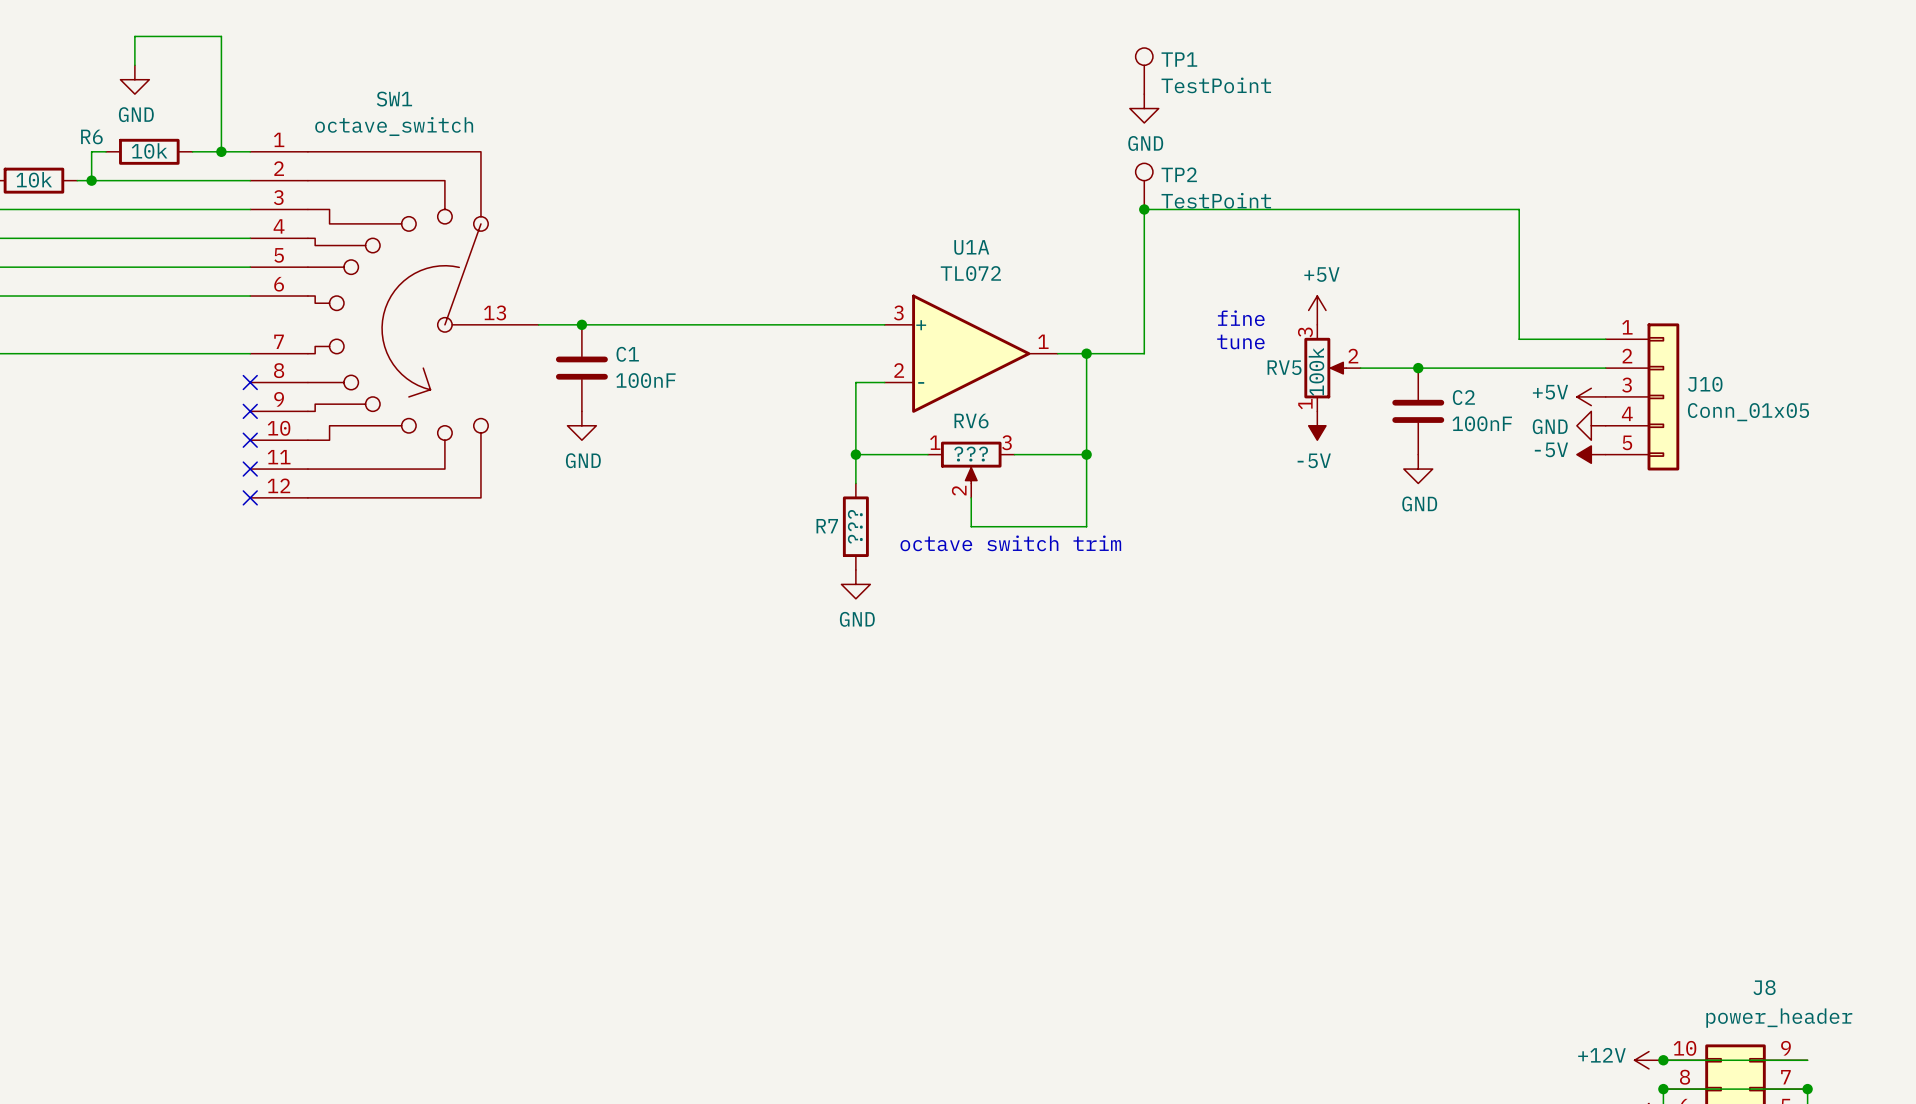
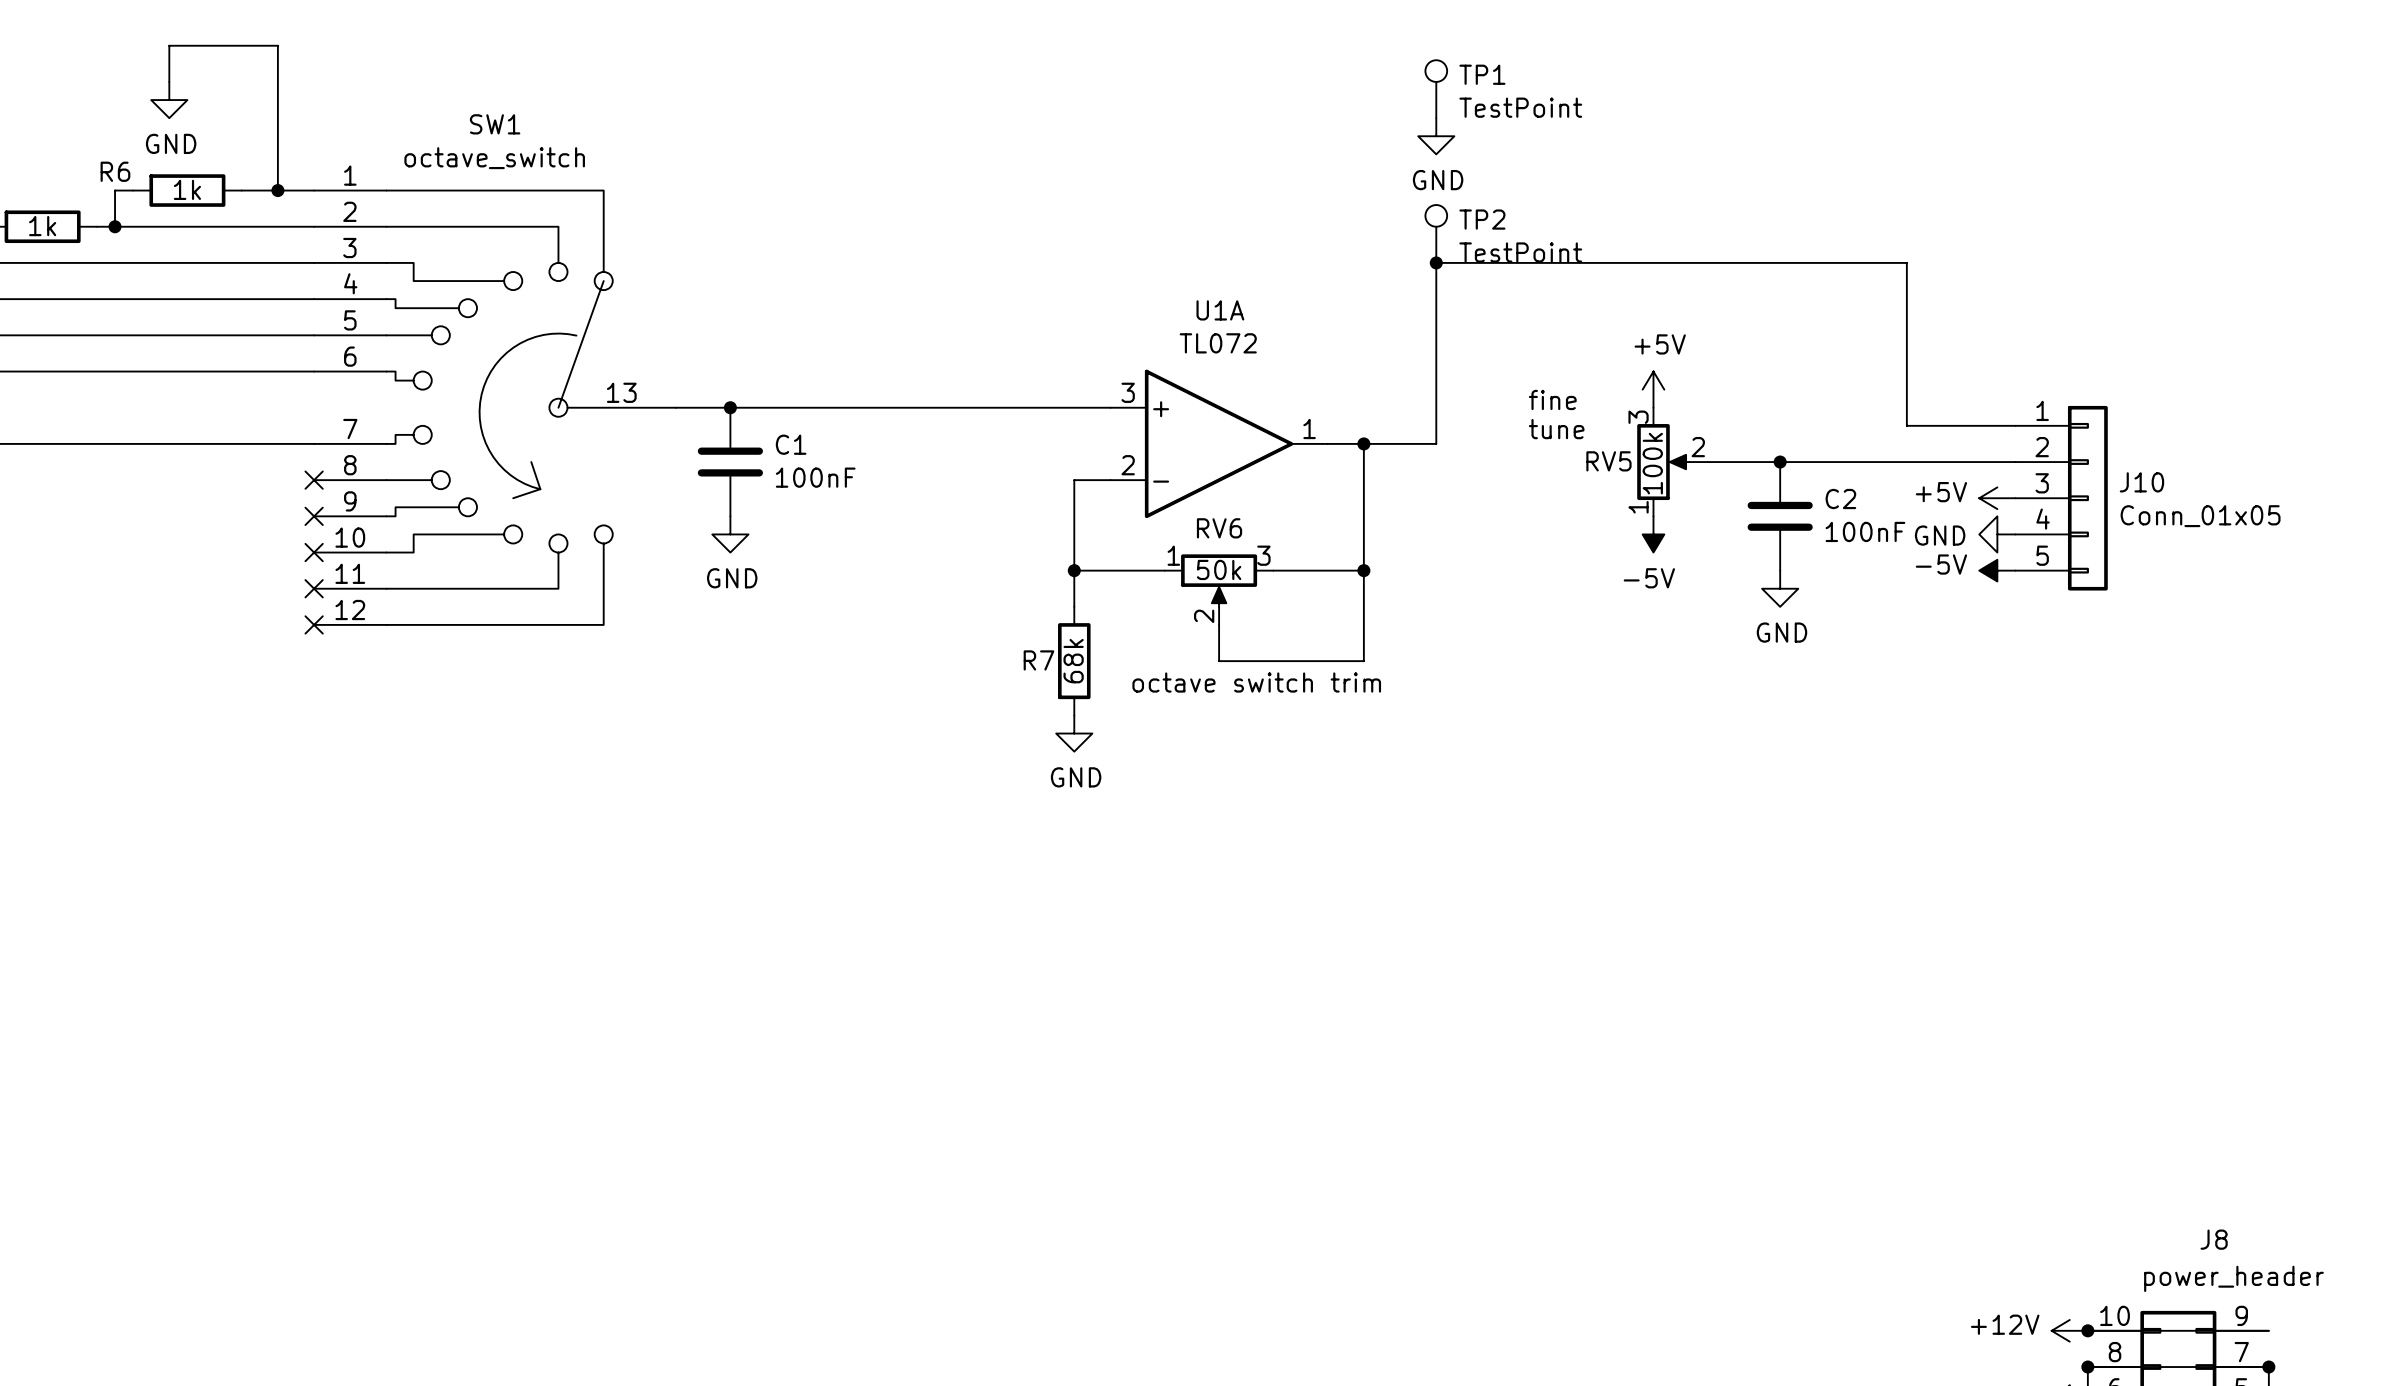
R6 value: 10k (149, 150) -> 1k (187, 189)
part value: 10k (34, 179) -> 1k (42, 226)
RV6 value: ??? (971, 454) -> 50k (1219, 569)
R7 value: ??? (855, 526) -> 68k (1073, 661)

